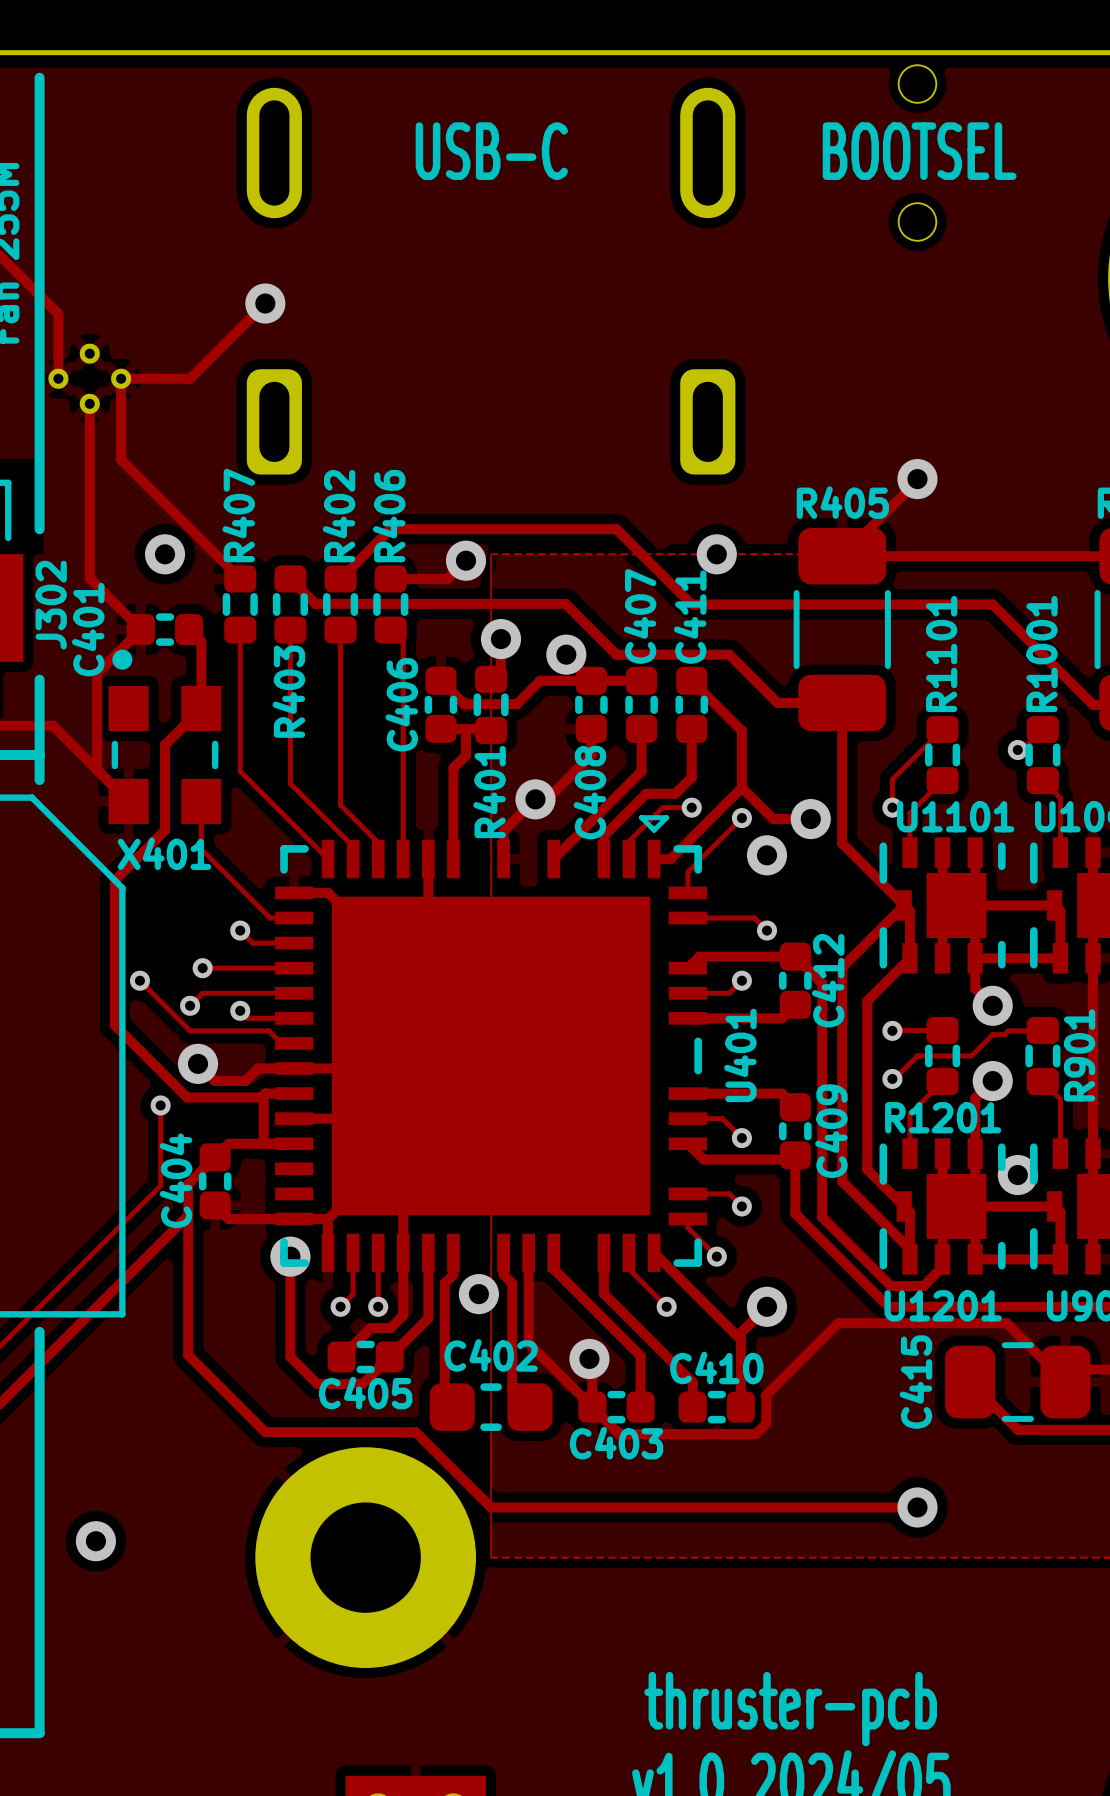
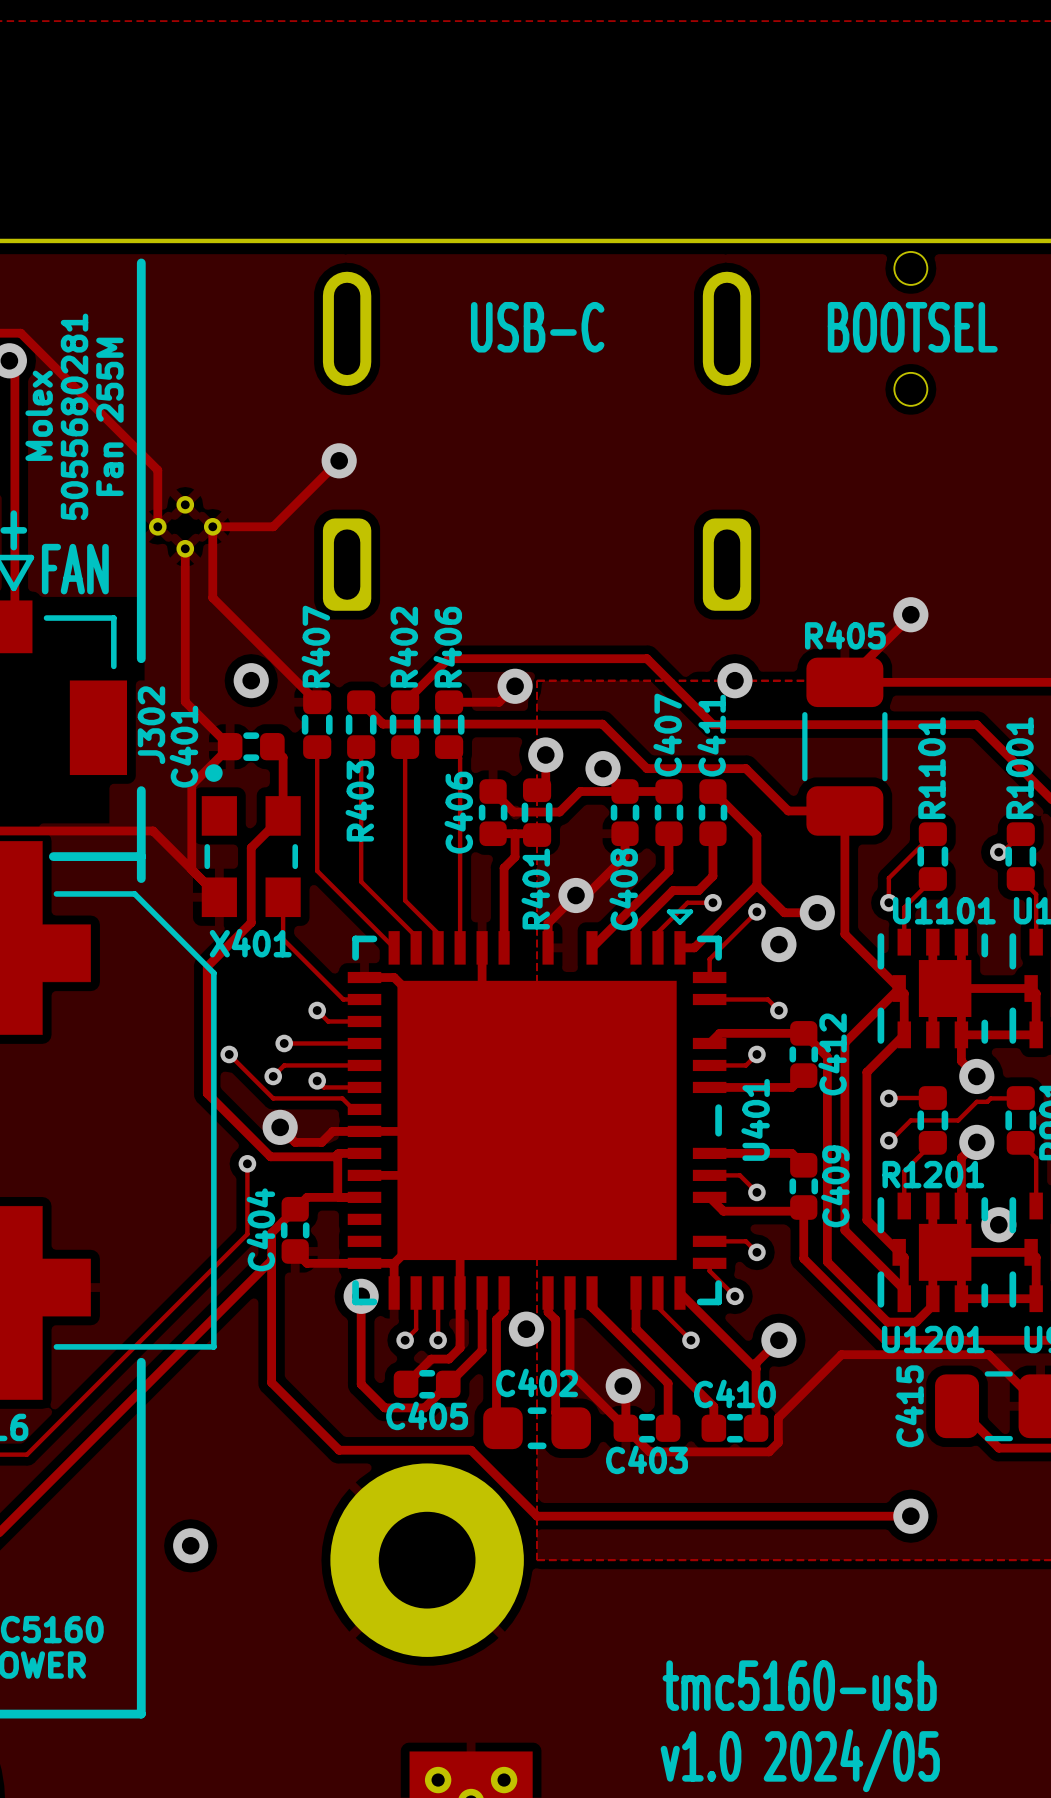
text: thruster-pcb (790, 1709) -> tmc5160-usb (799, 1685)

